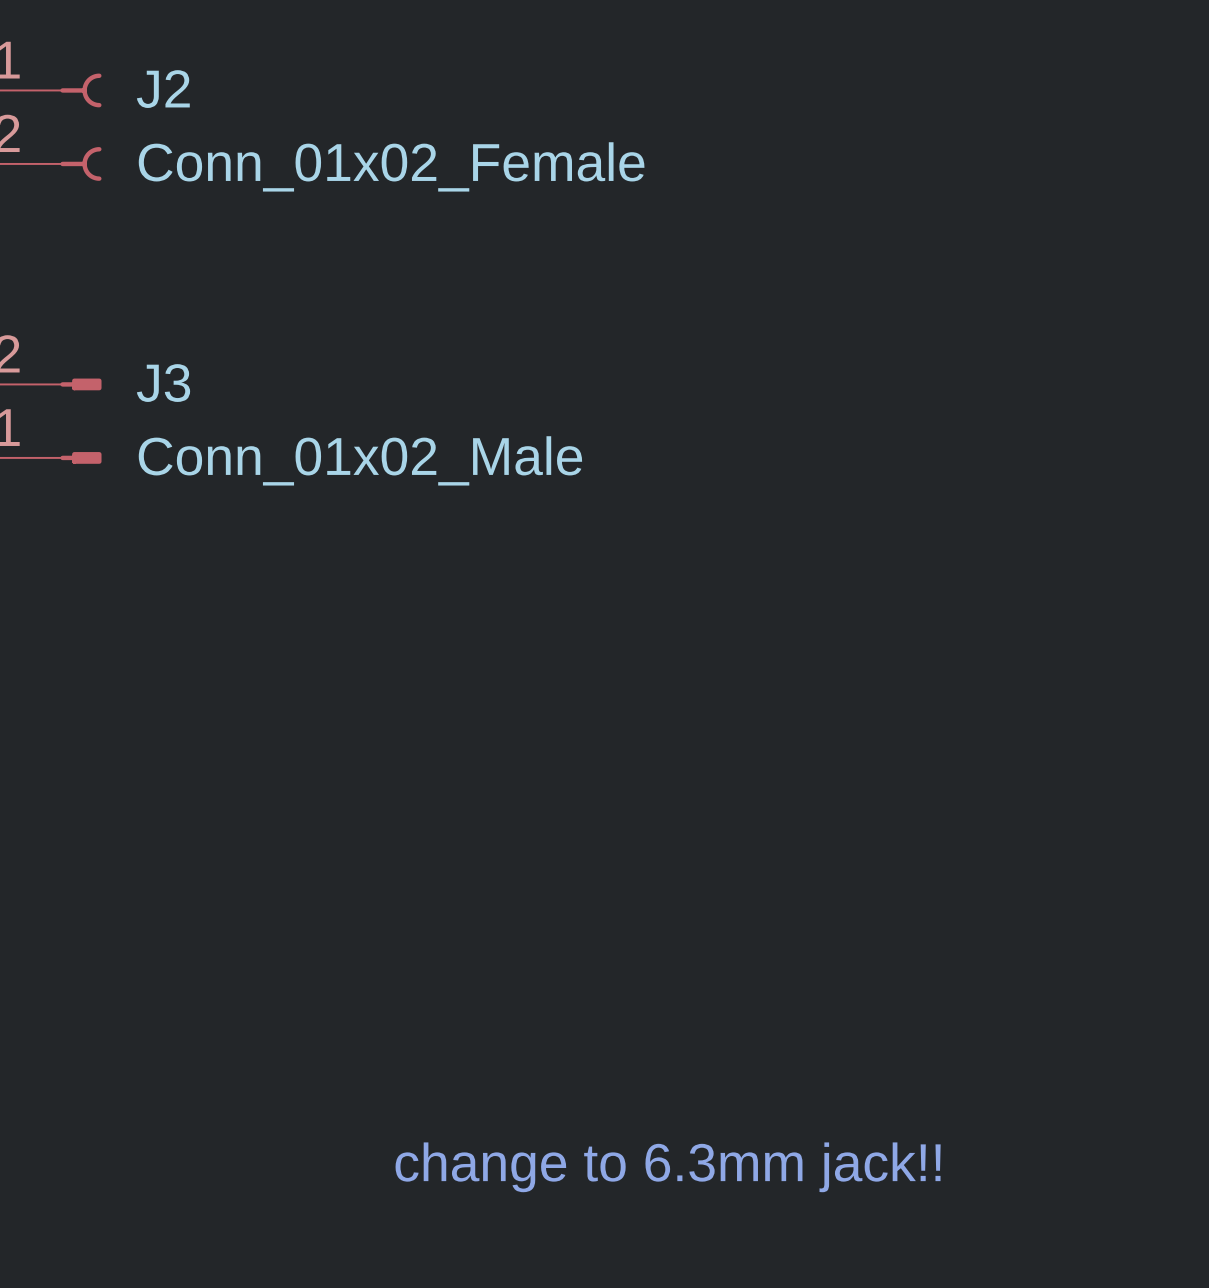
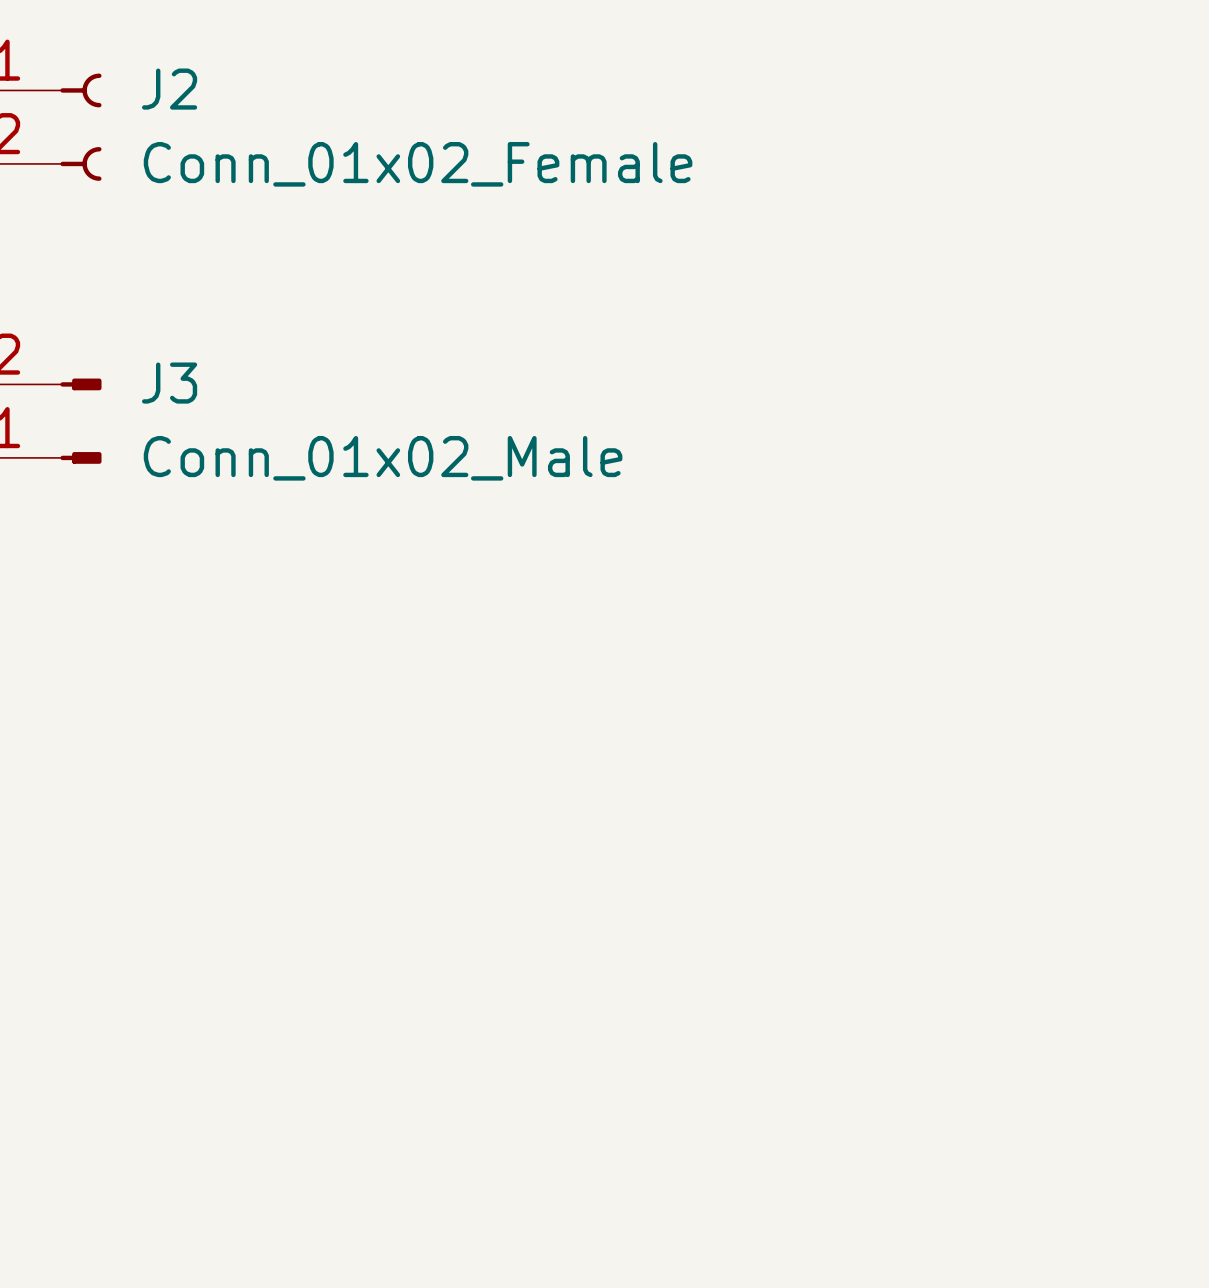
text: change to 6.3mm jack!! (668, 1167) -> none

